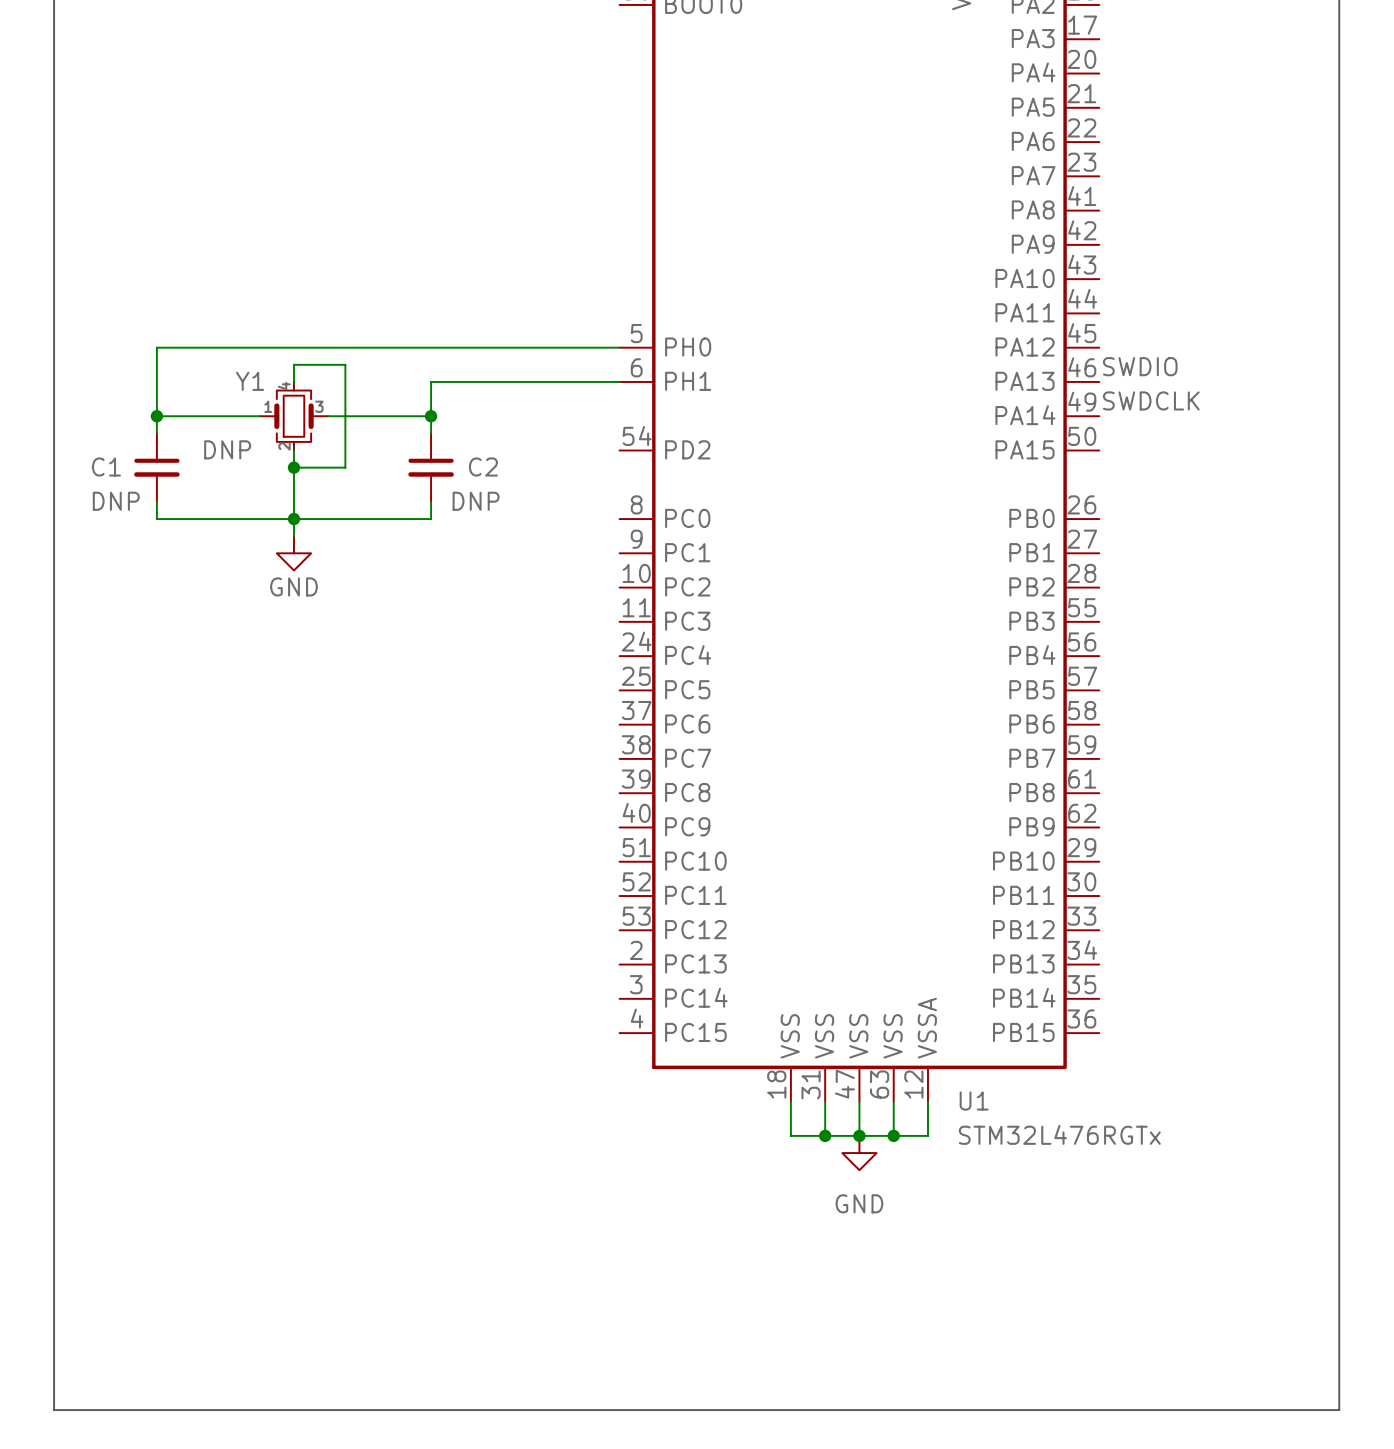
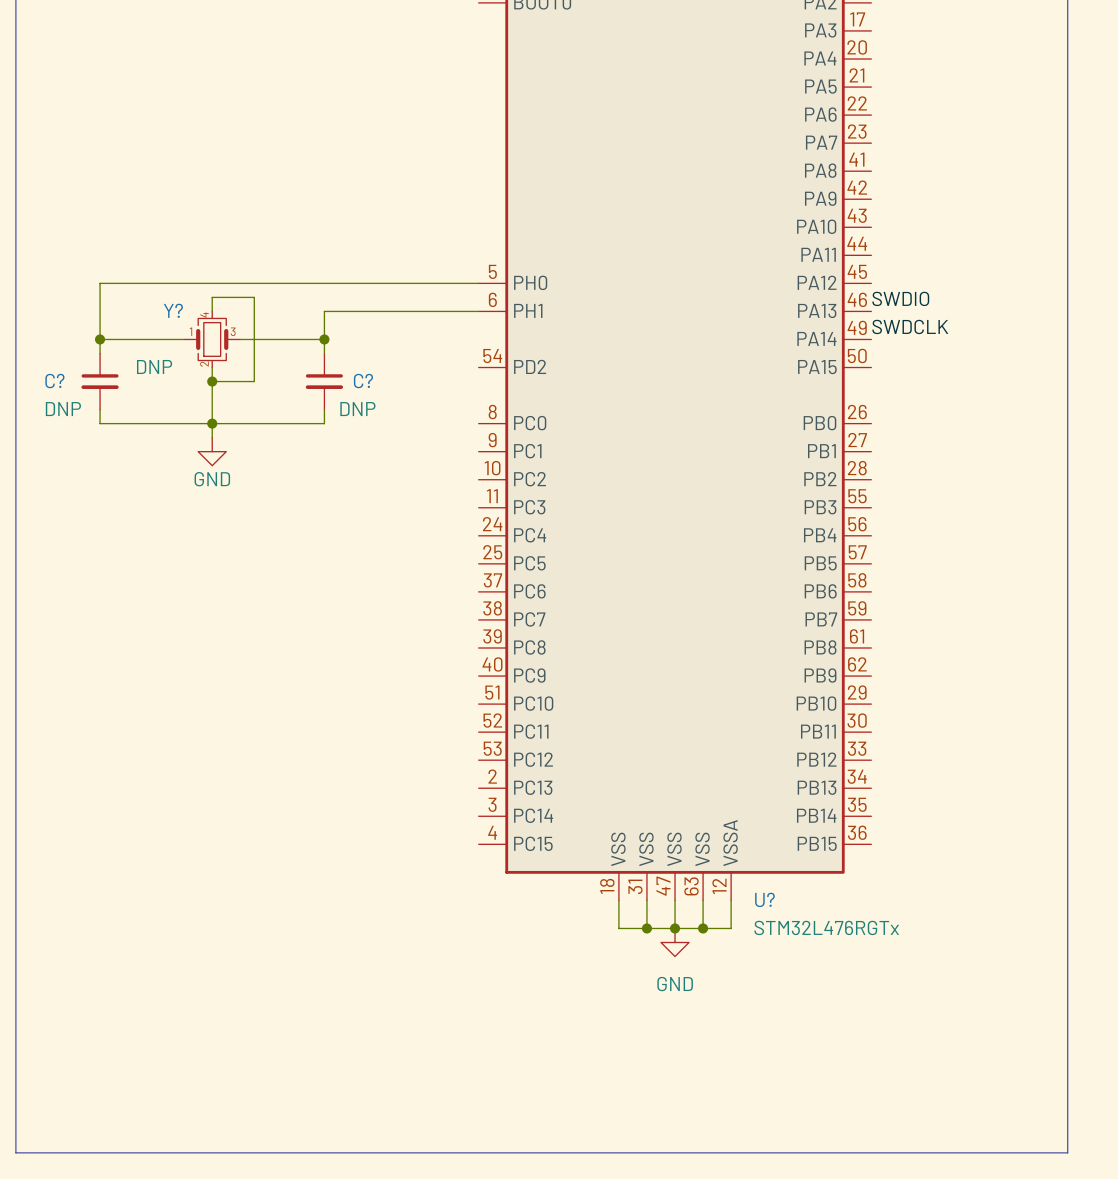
Y1 name: Y1 (250, 381) -> Y? (173, 310)
C1 name: C1 (106, 466) -> C? (54, 381)
C2 name: C2 (483, 466) -> C? (363, 381)
U1 name: U1 (974, 1101) -> U? (764, 899)

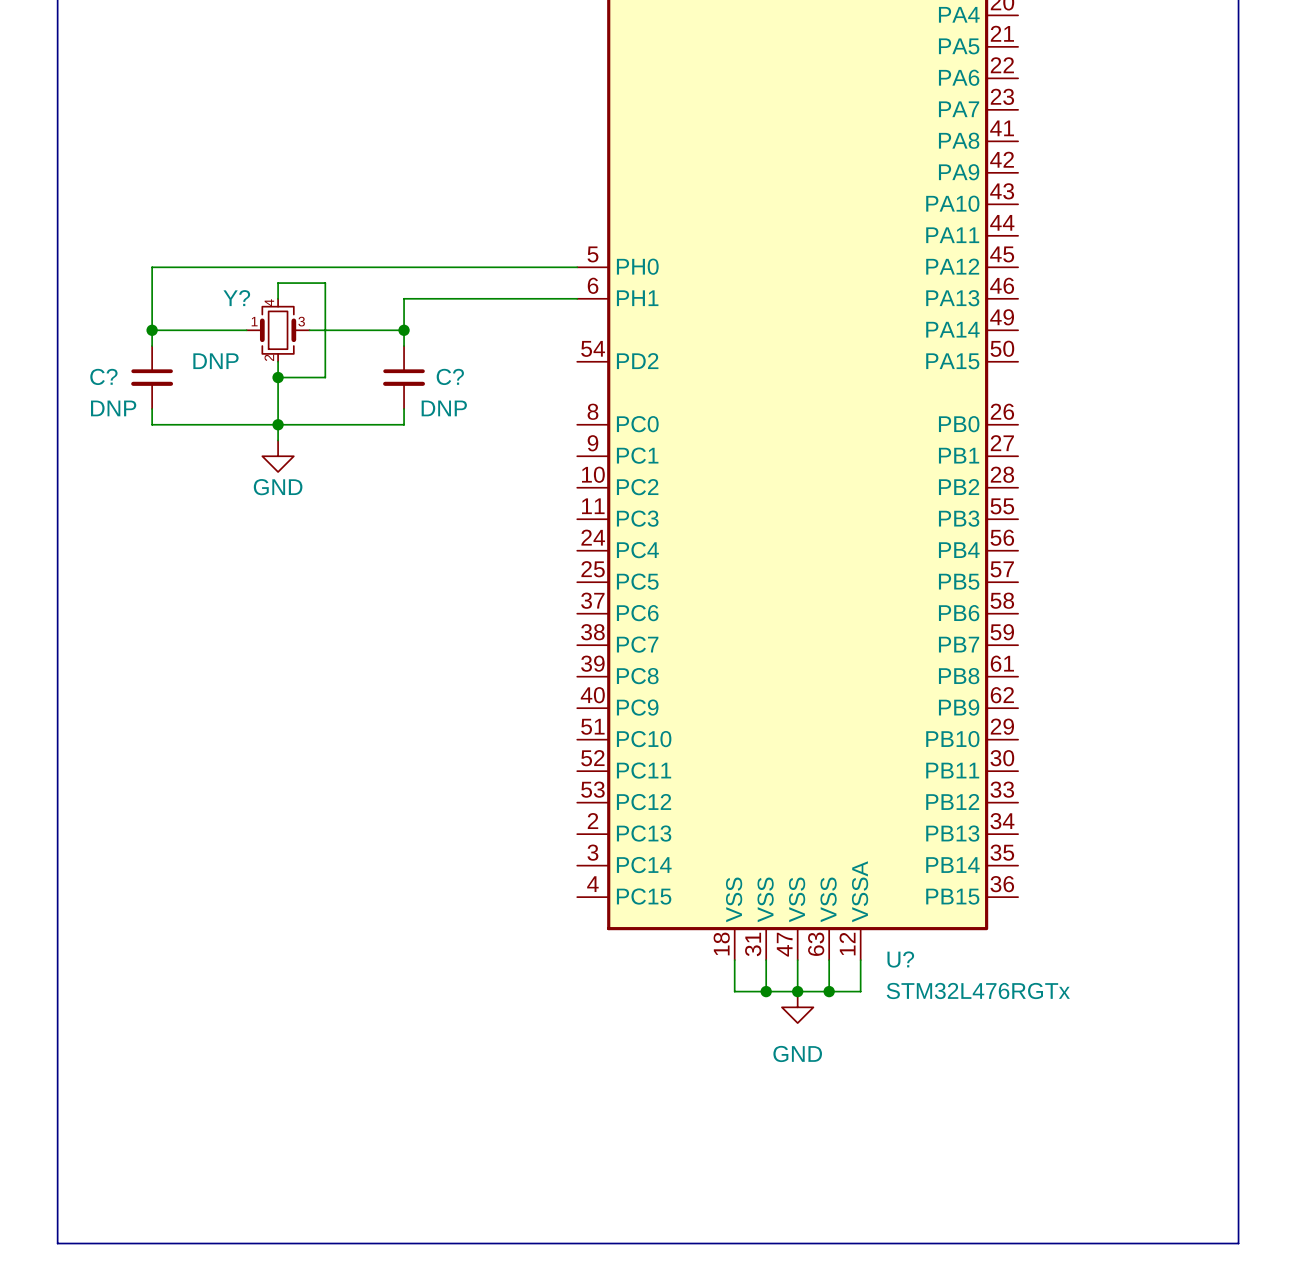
label: SWDIO (900, 298) -> none
label: SWDCLK (910, 326) -> none

